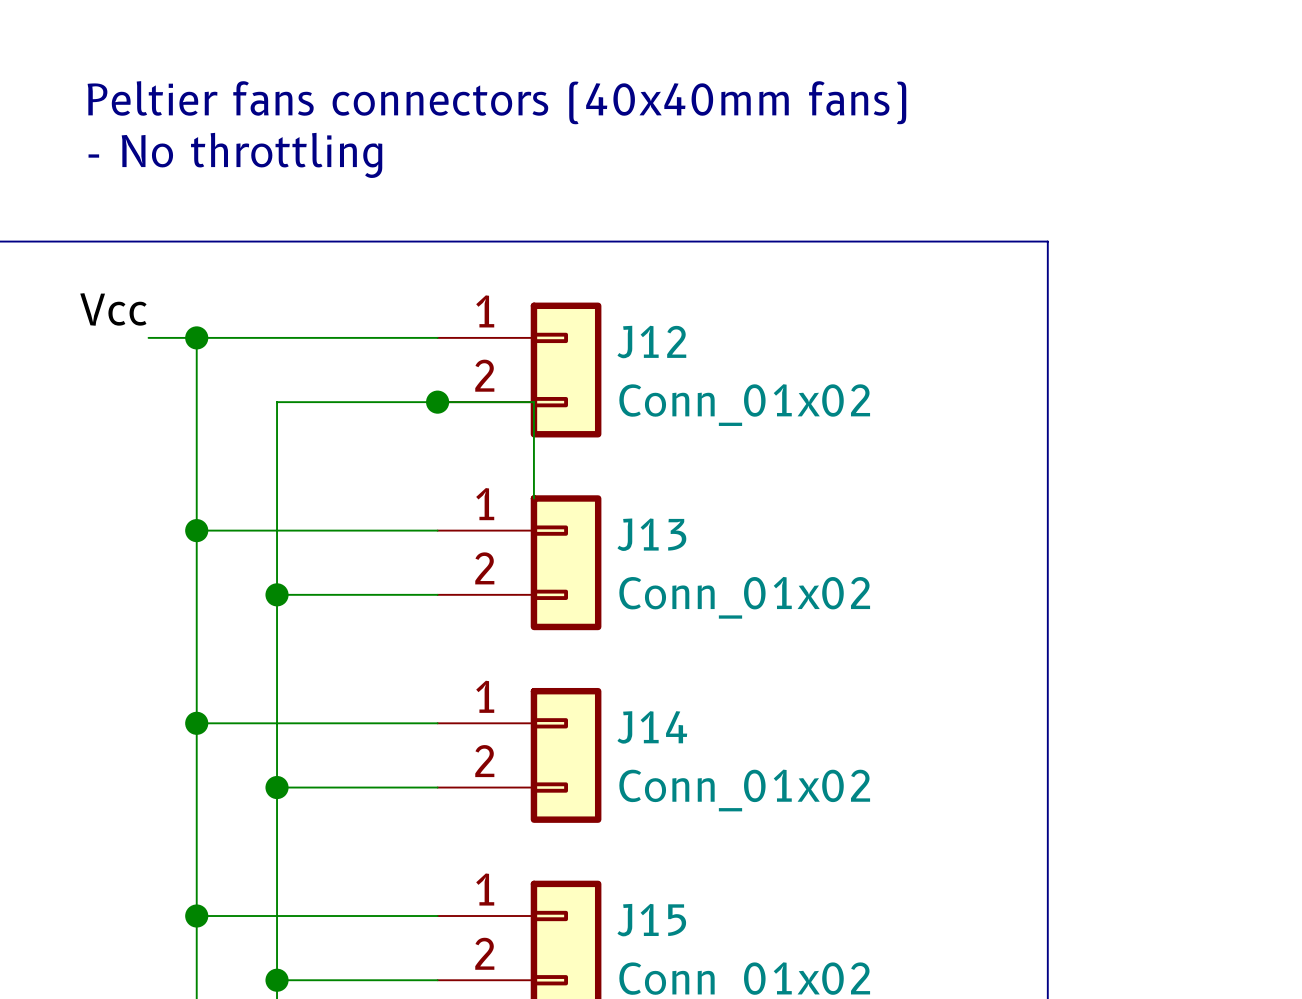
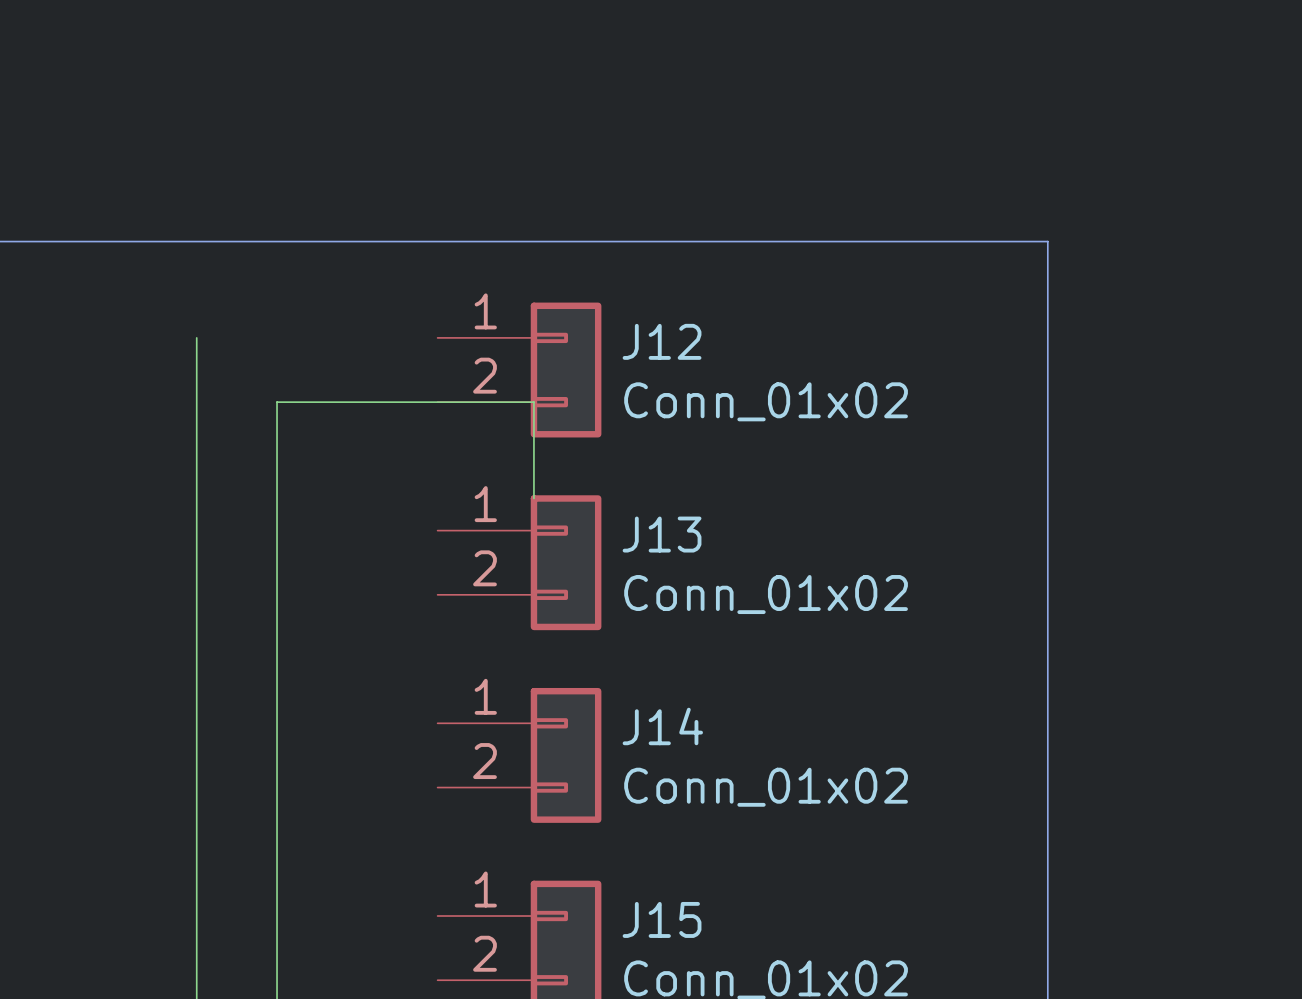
text: Peltier fans connectors (40x40mm fans) (496, 102) -> none
text: - No throttling (235, 155) -> none
label: Vcc (113, 309) -> none
wire: (148, 337) (437, 337) -> none
junction: (196, 337) -> none
junction: (437, 402) -> none
wire: (196, 530) (437, 530) -> none
junction: (196, 530) -> none
wire: (277, 594) (437, 594) -> none
junction: (277, 594) -> none
wire: (196, 723) (437, 723) -> none
junction: (196, 723) -> none
wire: (277, 787) (437, 787) -> none
junction: (277, 787) -> none
wire: (196, 916) (437, 916) -> none
junction: (196, 916) -> none
wire: (277, 980) (437, 980) -> none
junction: (277, 980) -> none

